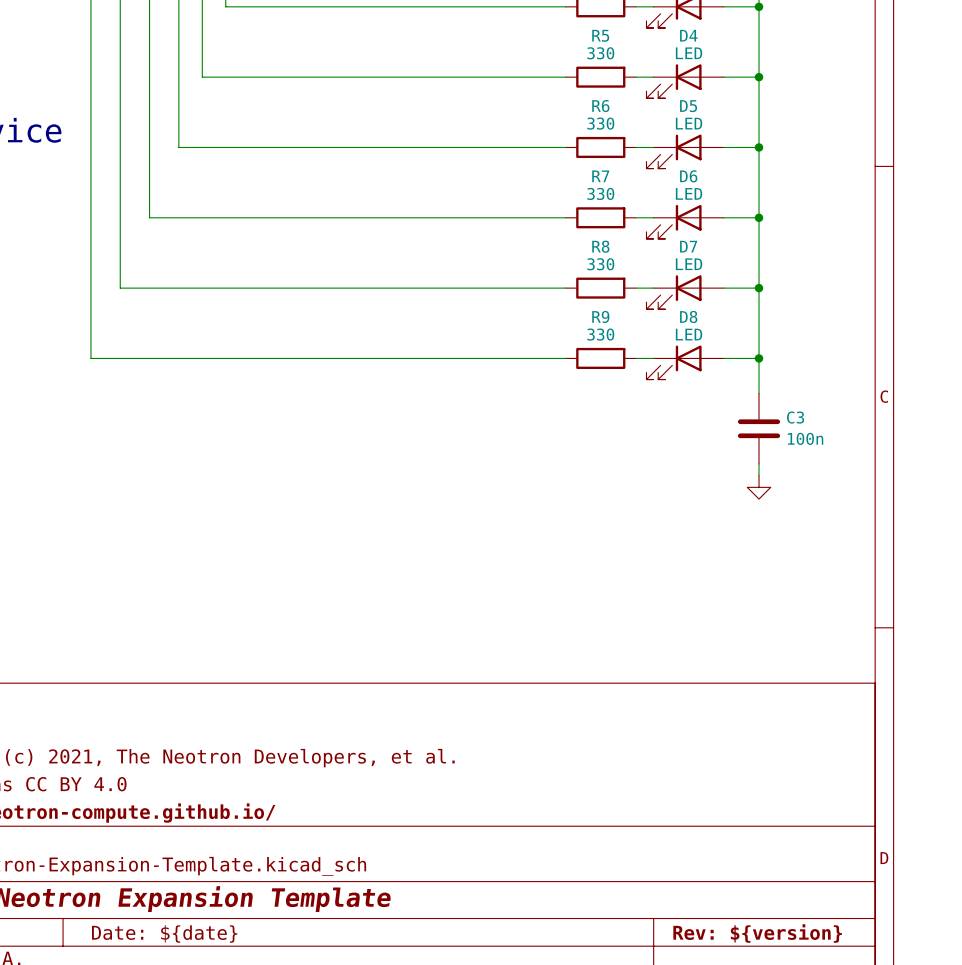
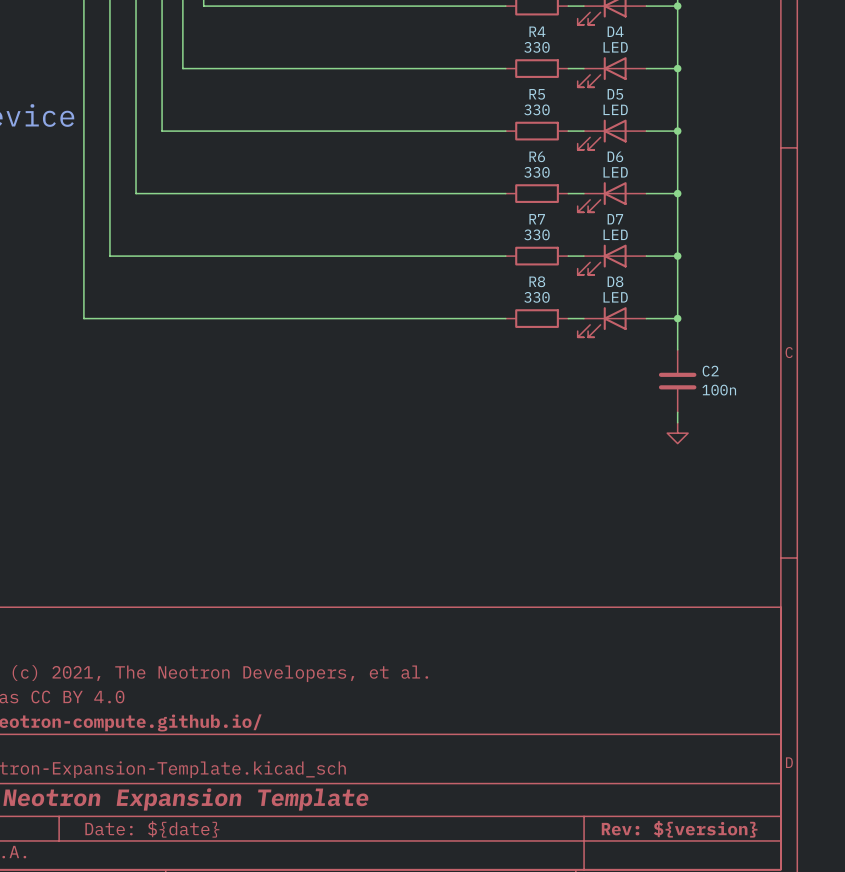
R5 name: R5 (600, 35) -> R4 (537, 31)
R6 name: R6 (600, 106) -> R5 (537, 94)
R7 name: R7 (600, 176) -> R6 (537, 156)
R8 name: R8 (600, 246) -> R7 (537, 219)
R9 name: R9 (600, 316) -> R8 (537, 281)
C3 name: C3 (795, 417) -> C2 (710, 371)

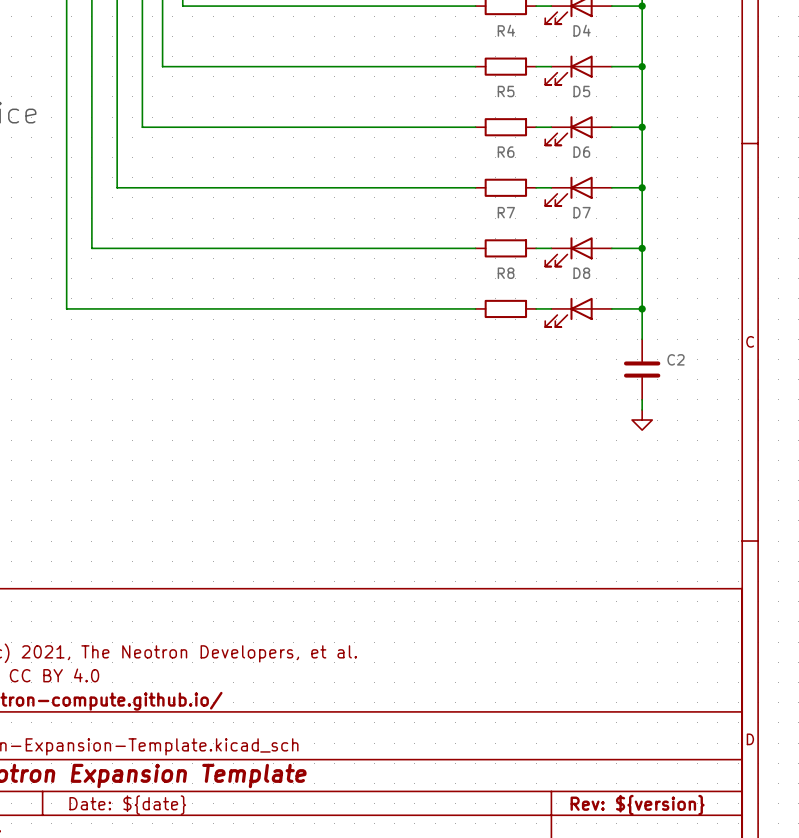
R4 value: 330 (536, 47) -> none
D4 value: LED (615, 47) -> none
R5 value: 330 (536, 109) -> none
D5 value: LED (615, 109) -> none
R6 value: 330 (536, 172) -> none
D6 value: LED (615, 172) -> none
R7 value: 330 (536, 234) -> none
D7 value: LED (615, 234) -> none
R8 value: 330 (536, 297) -> none
D8 value: LED (615, 297) -> none
C2 value: 100n (719, 390) -> none

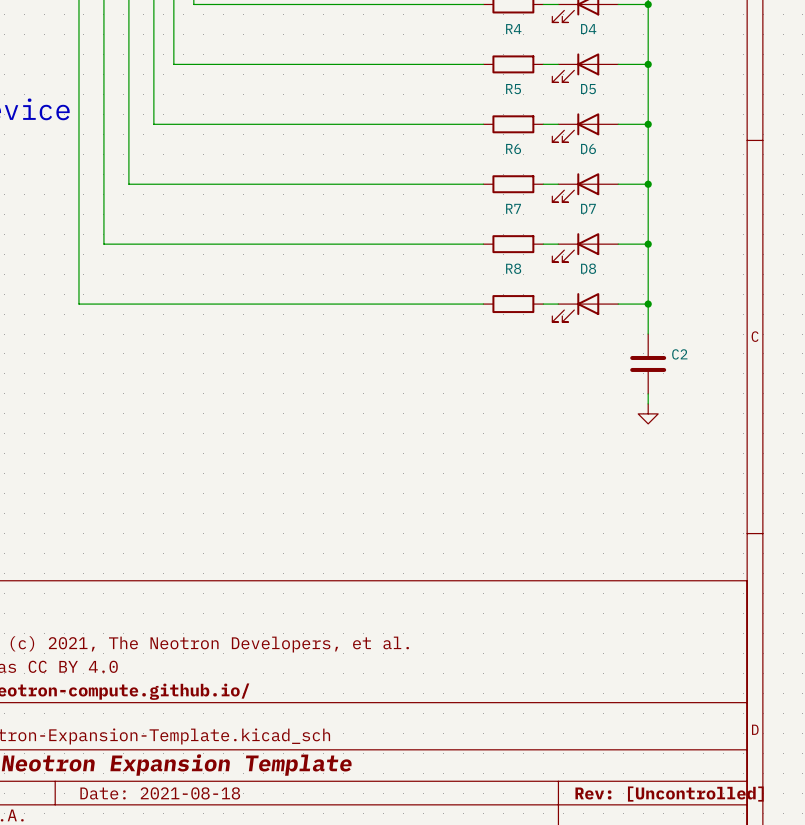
title block: Date: ${date} (127, 805) -> Date: 2021-08-18 (160, 793)
title block: Rev: ${version} (637, 805) -> Rev: [Uncontrolled] (669, 794)

